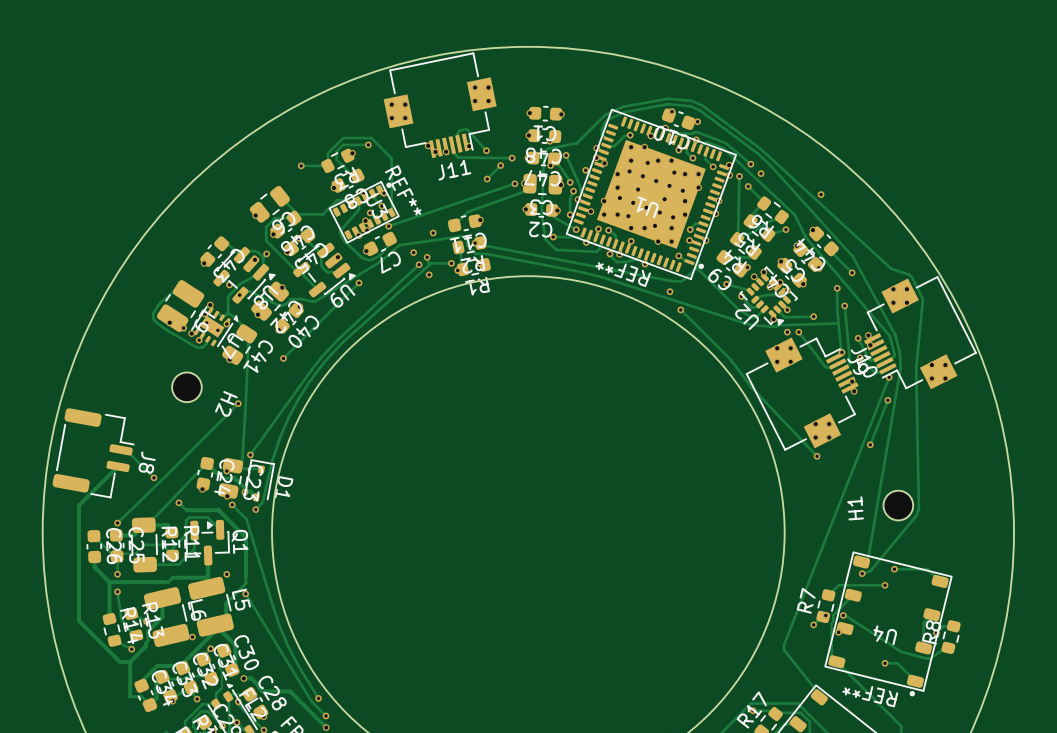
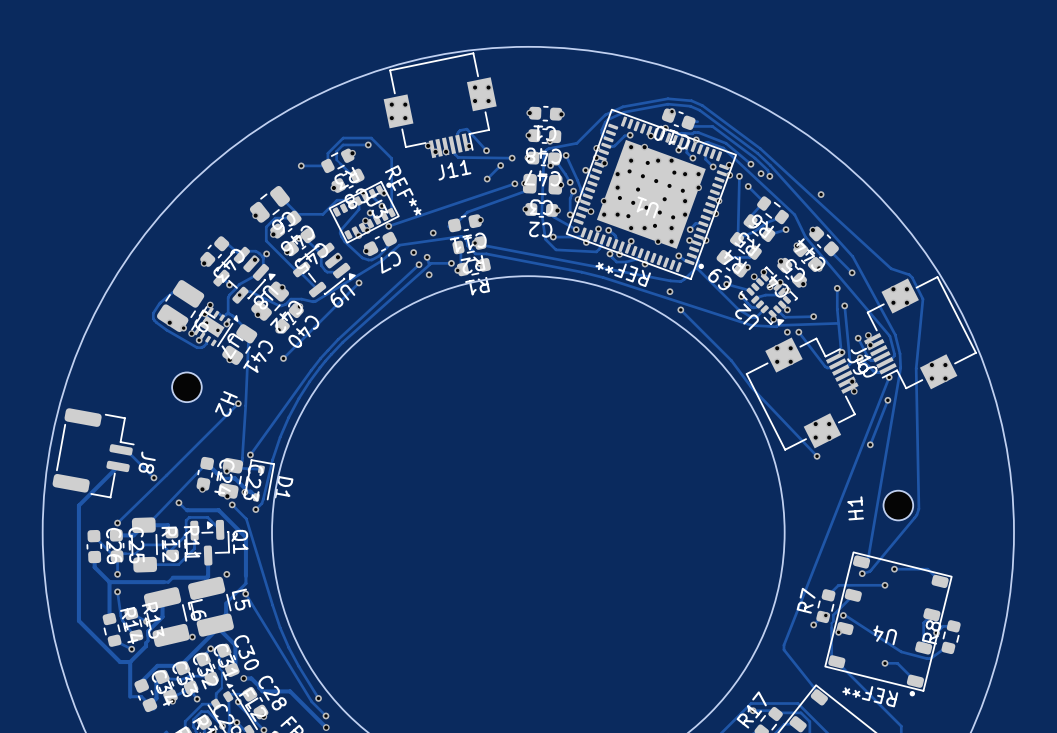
via: (697, 121) -> none
track: none -> (693, 126) (712, 126) (754, 158) (767, 170) (769, 176)
via: none -> (769, 176)

